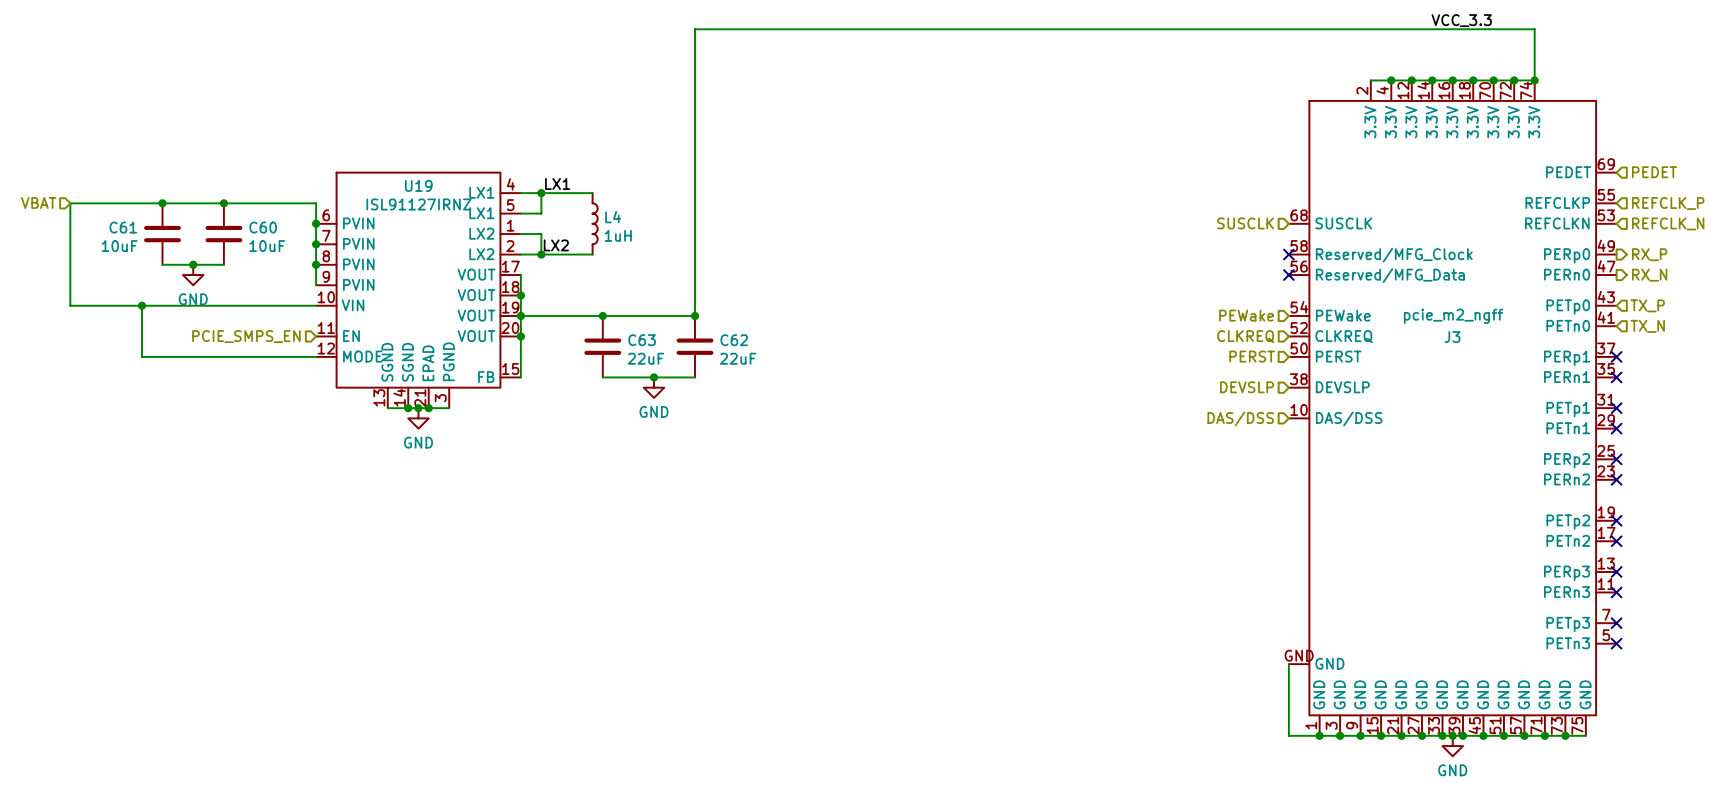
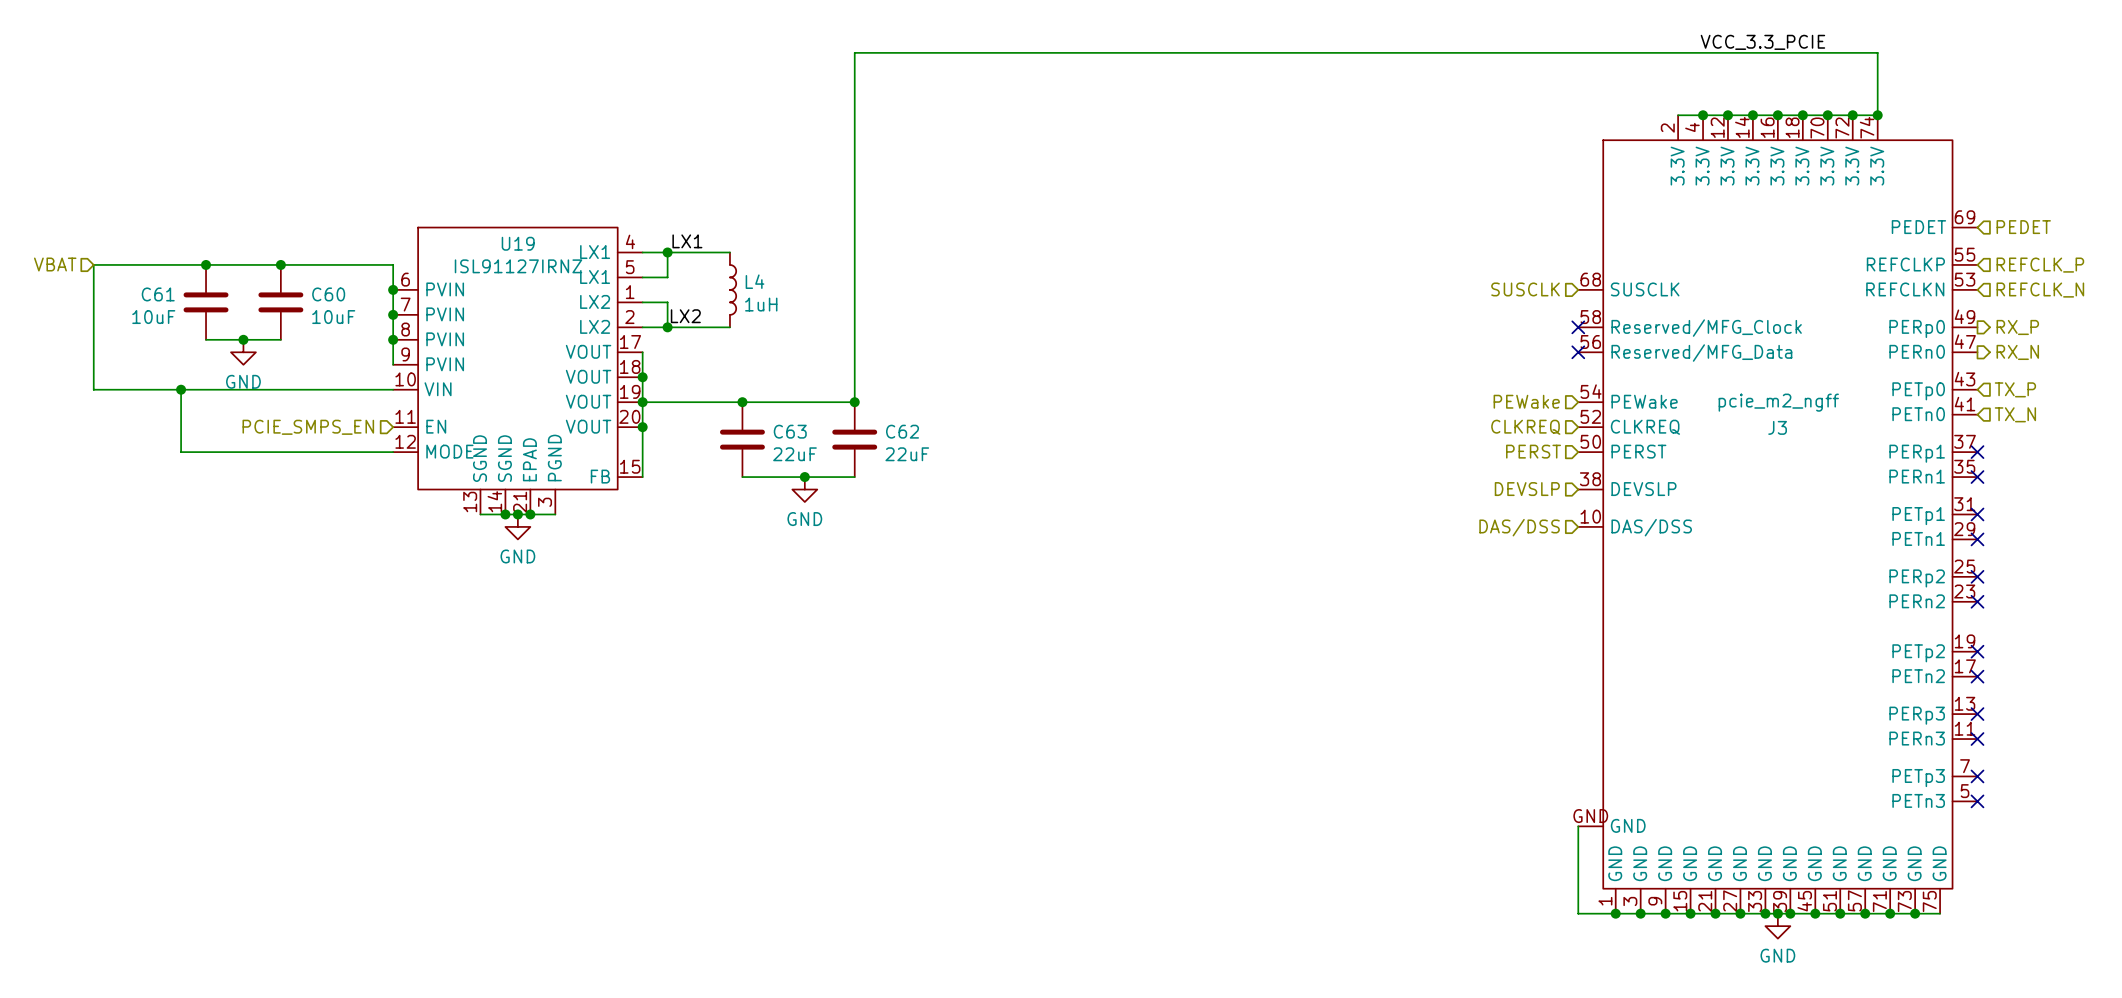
label: VCC_3.3 (1461, 20) -> VCC_3.3_PCIE (1762, 42)

